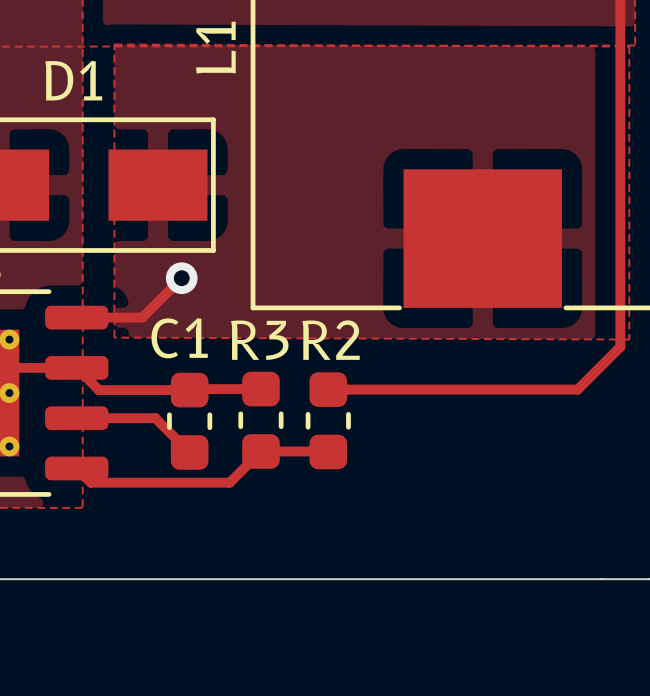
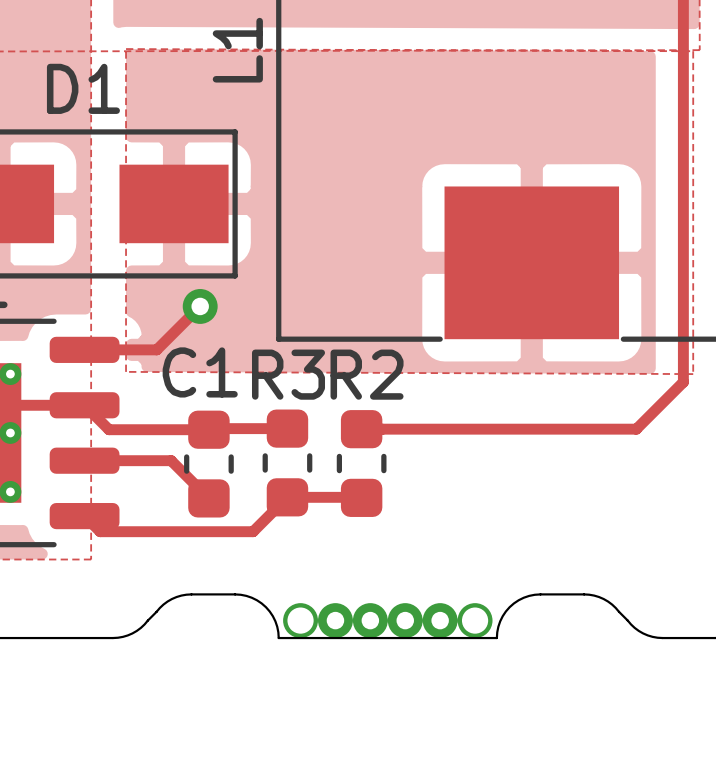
part: none -> (387, 620)
board edge: (102, 579) (253, 579) -> (112, 638) (127, 635) (136, 630) (163, 604) (171, 599) (191, 594) (240, 594) (256, 600) (272, 616) (278, 638)
board edge: (451, 579) (601, 579) -> (496, 638) (500, 621) (509, 607) (523, 597) (540, 594) (584, 594) (599, 597) (612, 604) (638, 630) (652, 636) (662, 638)

